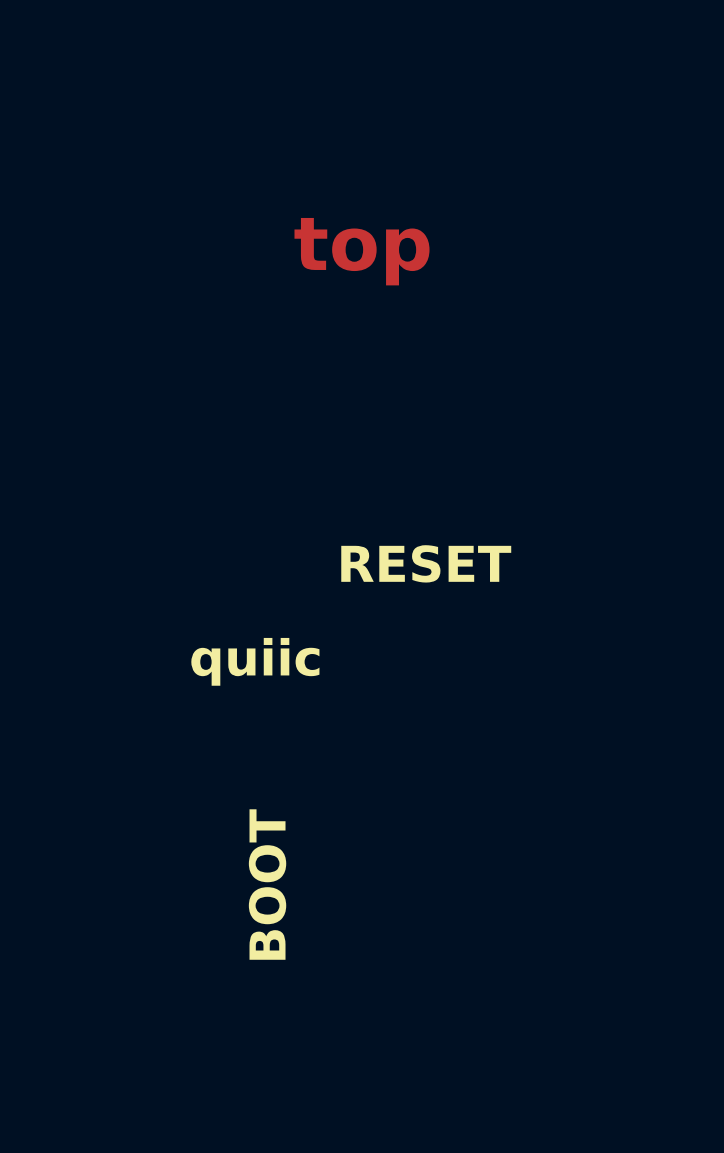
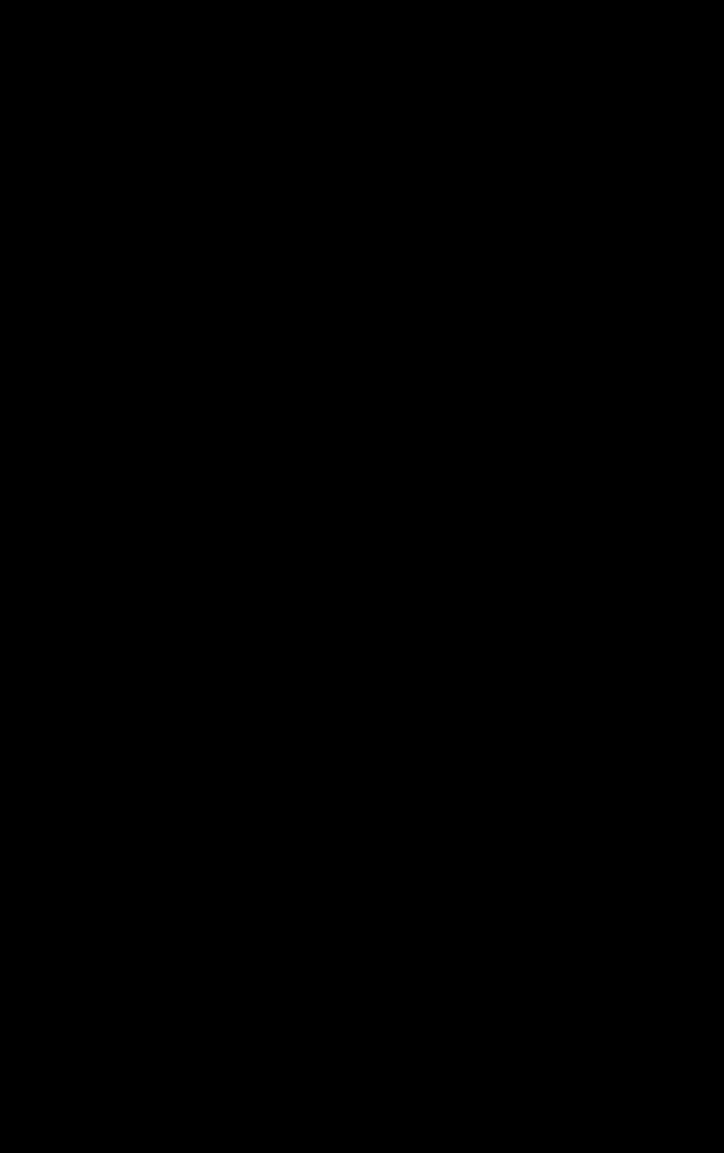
text: top (362, 251) -> none
text: RESET (426, 563) -> none
text: quiic (255, 661) -> none
text: BOOT (267, 884) -> none

